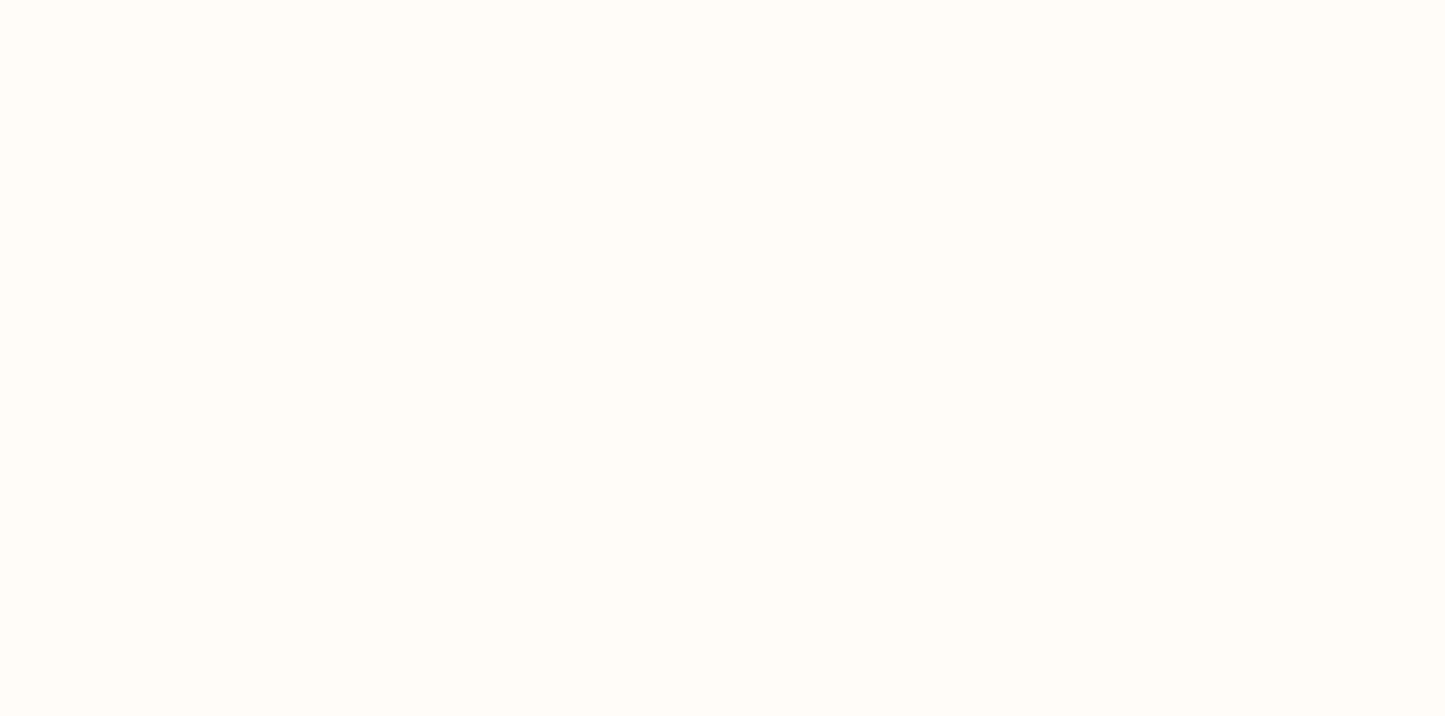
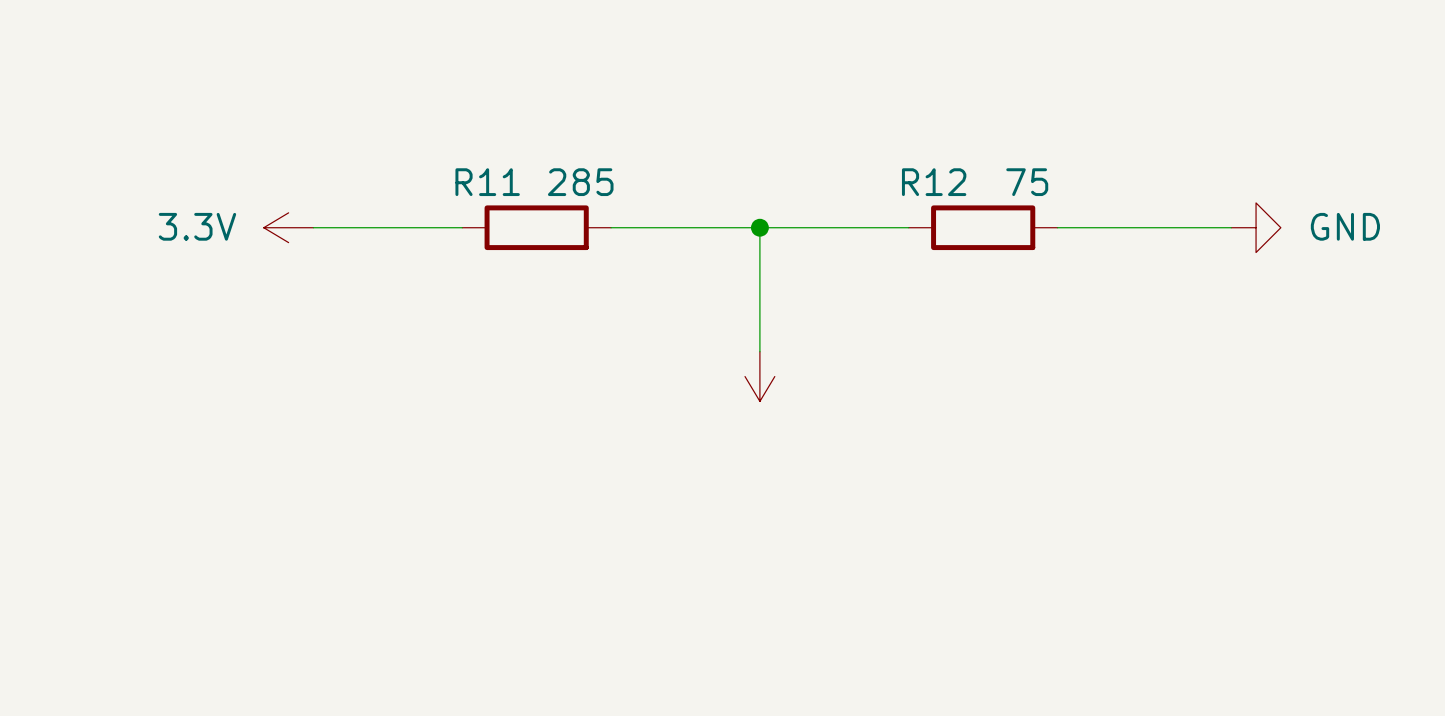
power symbol: none -> 3.3V (288, 227)
wire: none -> (313, 227) (462, 227)
R11: none -> 285 (536, 227)
wire: none -> (611, 227) (908, 227)
wire: none -> (759, 227) (759, 351)
junction: none -> (759, 227)
R12: none -> 75 (983, 227)
wire: none -> (1057, 227) (1231, 227)
power symbol: none -> GND (1256, 227)
power symbol: none -> (759, 376)

